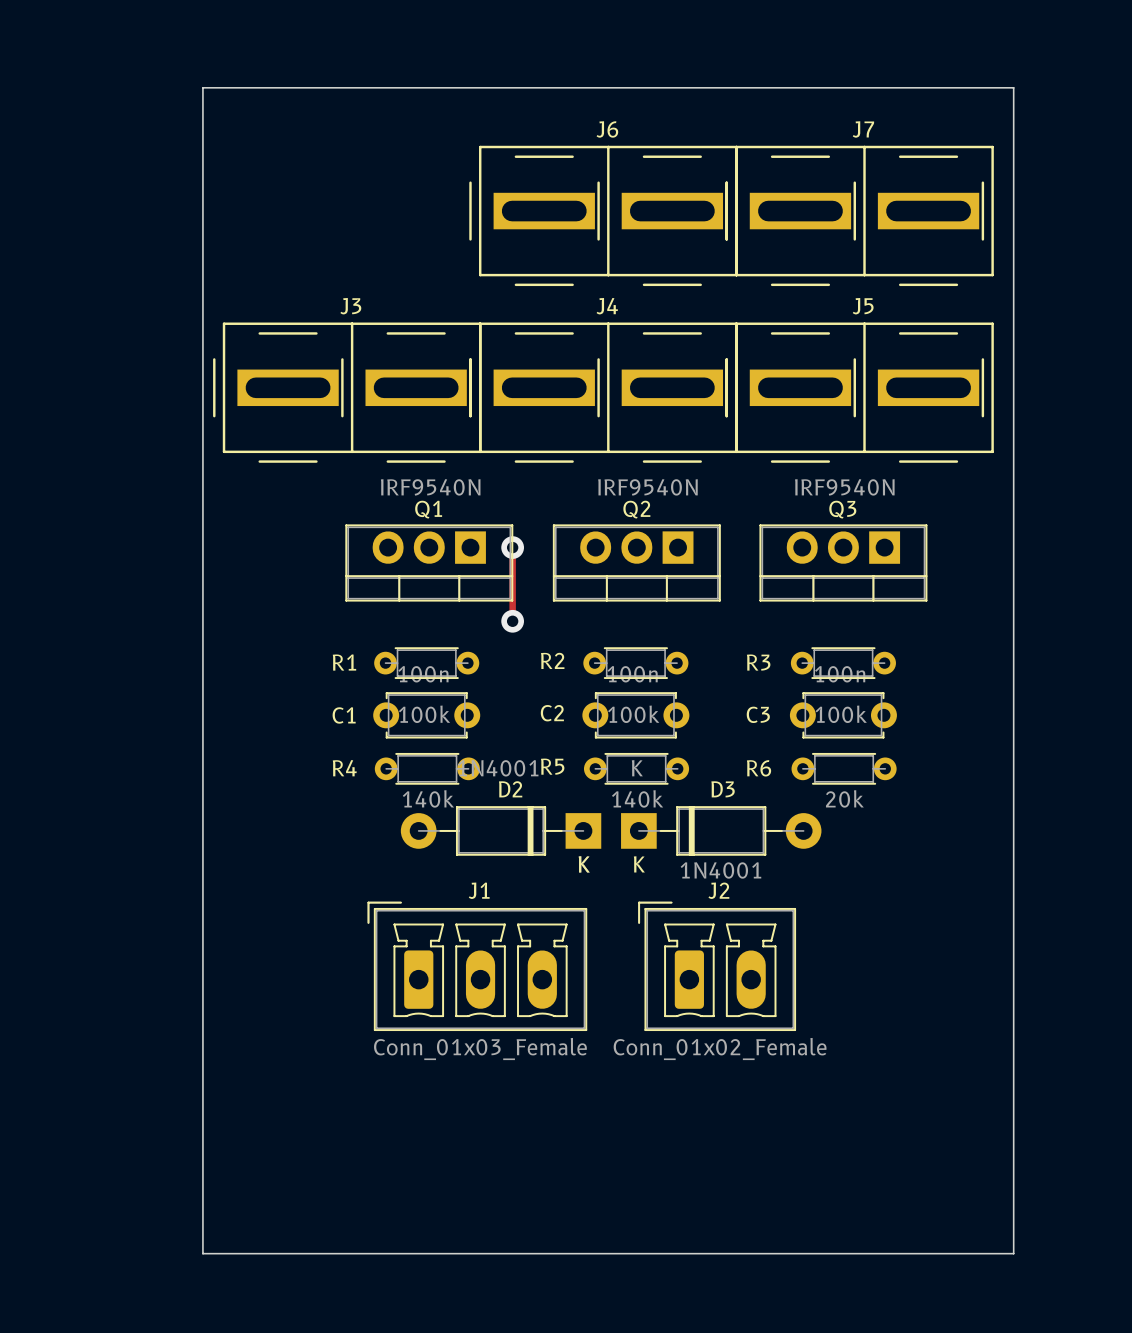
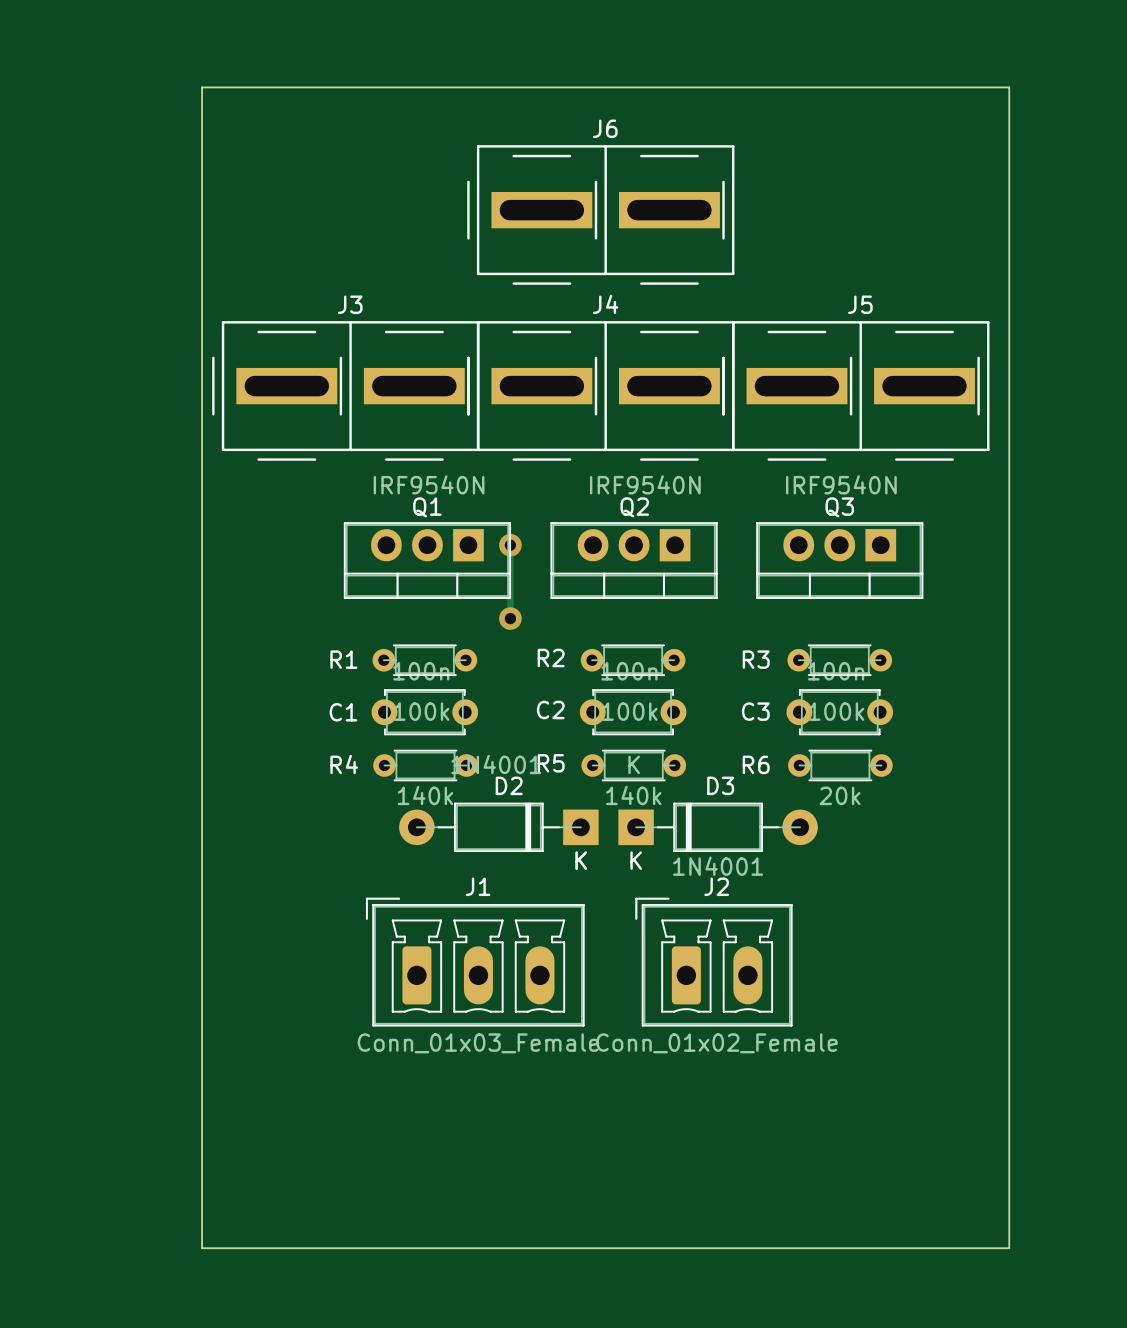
J7: (859, 215) -> none

